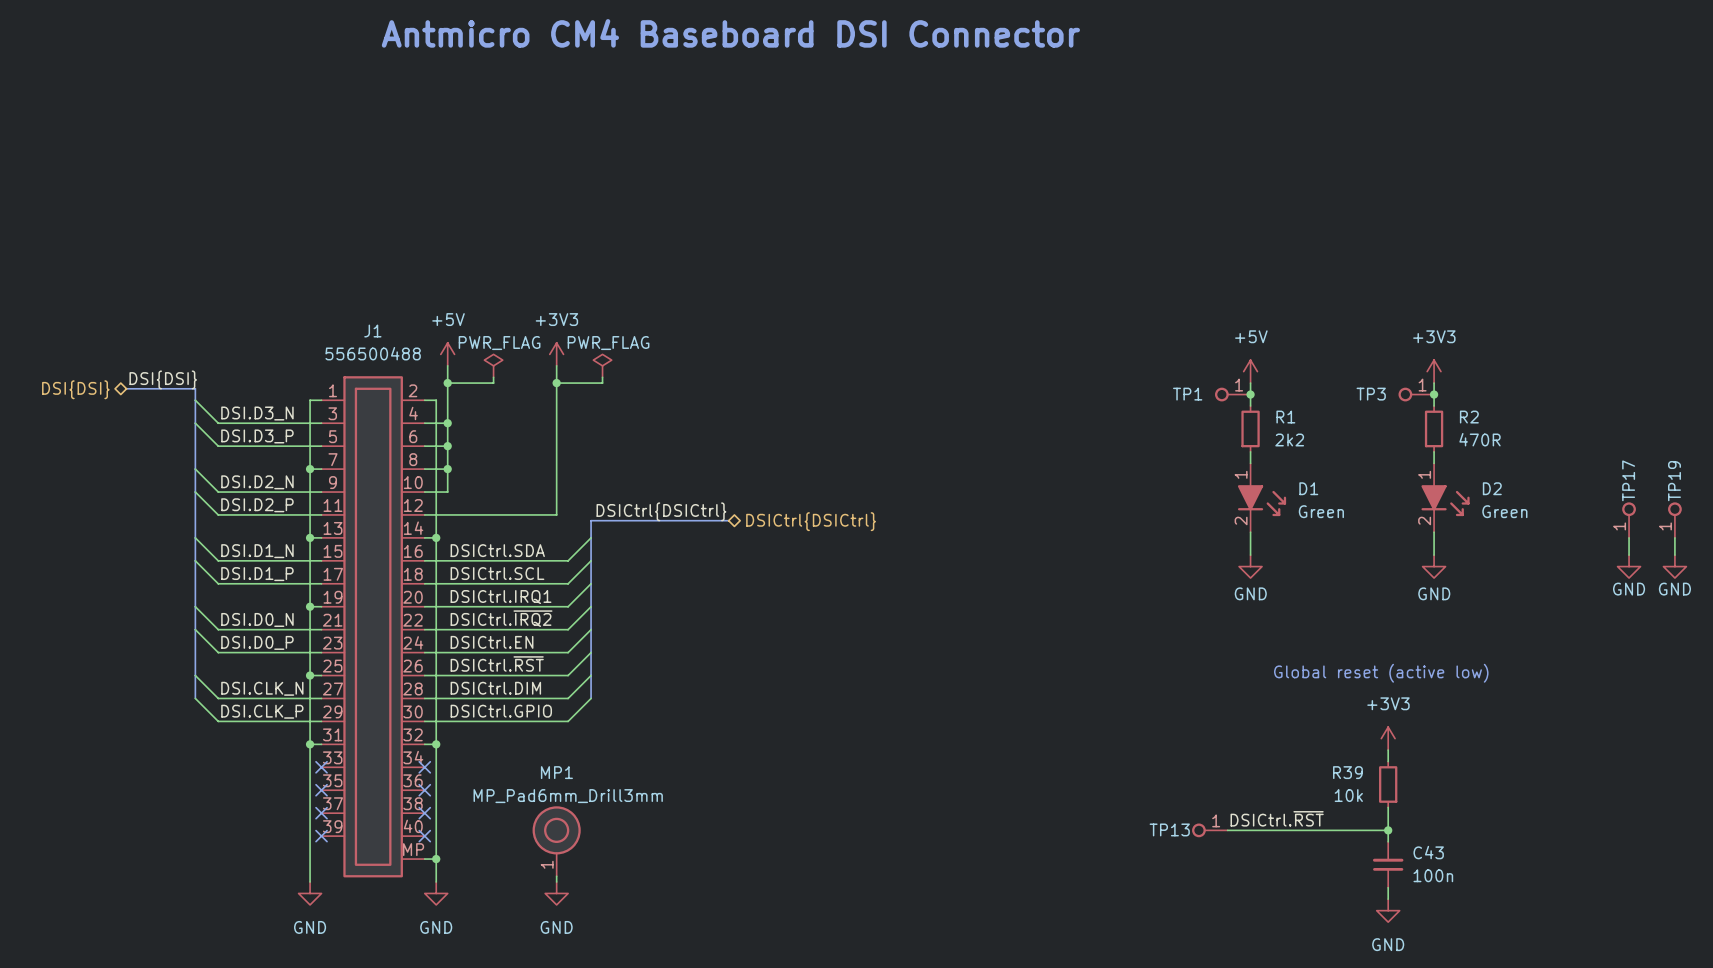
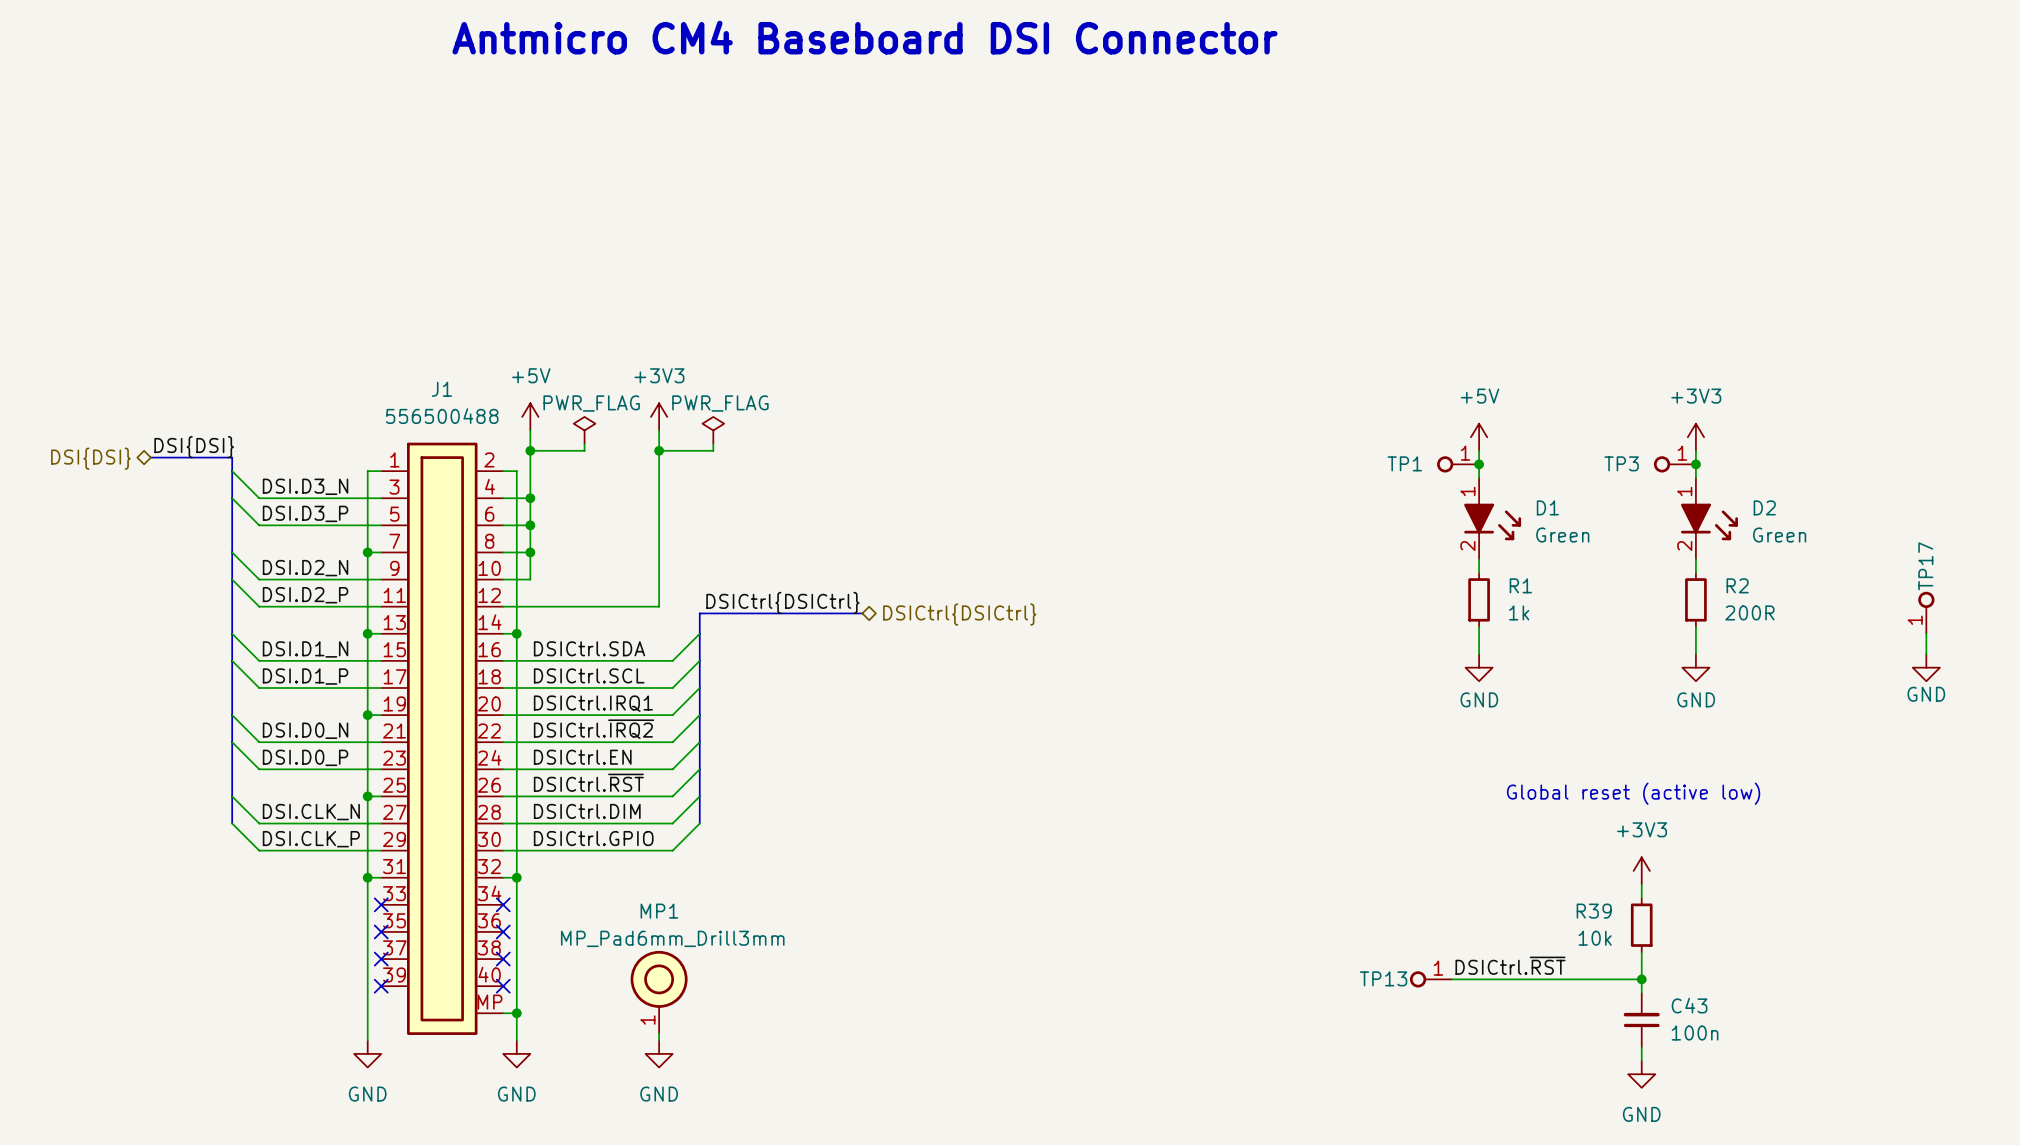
R1 position: (1250, 428) -> (1479, 599)
R2 position: (1434, 428) -> (1695, 599)
R1 text: 2k2 (1289, 439) -> 1k (1519, 612)
R2 text: 470R (1480, 439) -> 200R (1749, 612)
D1 position: (1262, 497) -> (1492, 518)
D2 position: (1445, 497) -> (1709, 518)
TP19: (1674, 520) -> none
wire: (1674, 537) (1674, 555) -> none
power symbol: GND (1674, 566) -> none

